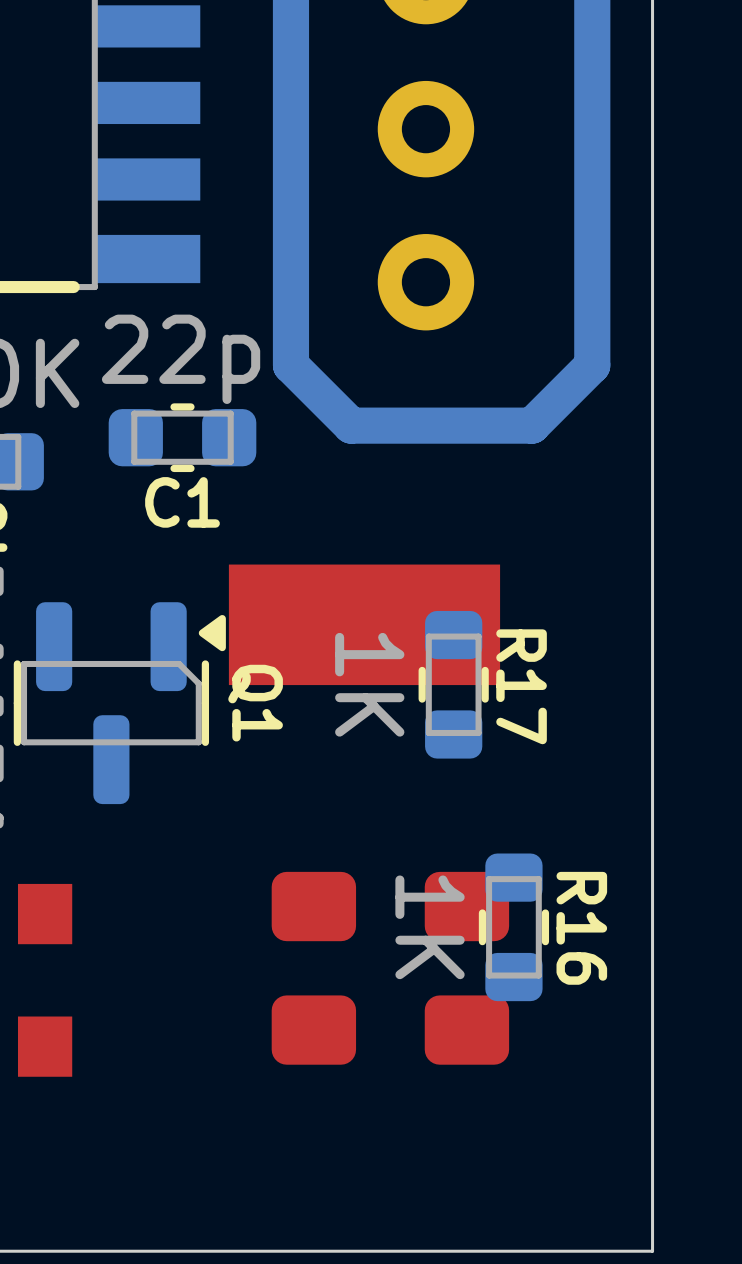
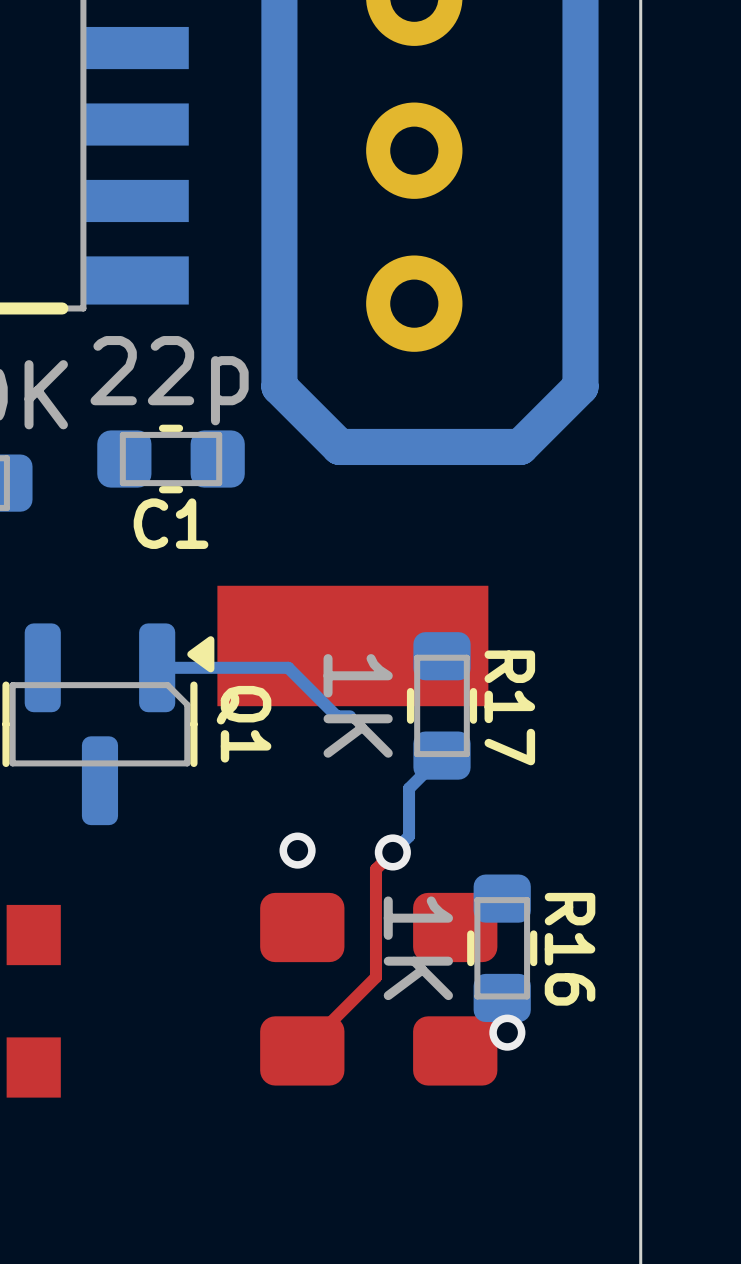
bottom track: none -> (157, 667) (288, 667) (336, 716) (350, 716)
bottom track: none -> (442, 755) (409, 788) (409, 836) (392, 852)
via: none -> (297, 850)
top track: none -> (392, 852) (375, 869) (375, 977) (302, 1050)
via: none -> (392, 852)
via: none -> (507, 1032)

